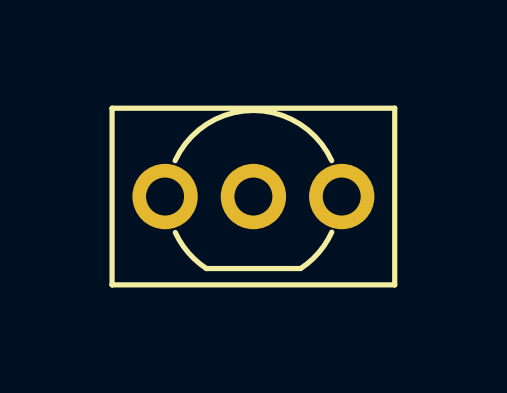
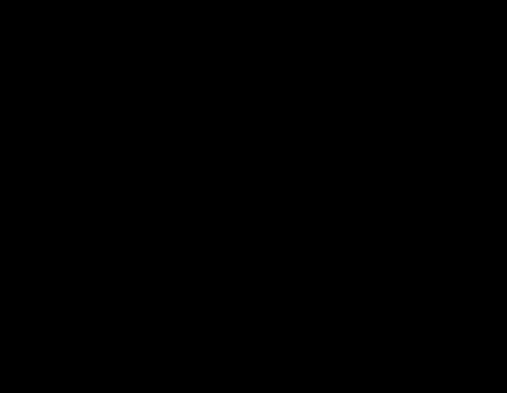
part: (253, 196) -> none

